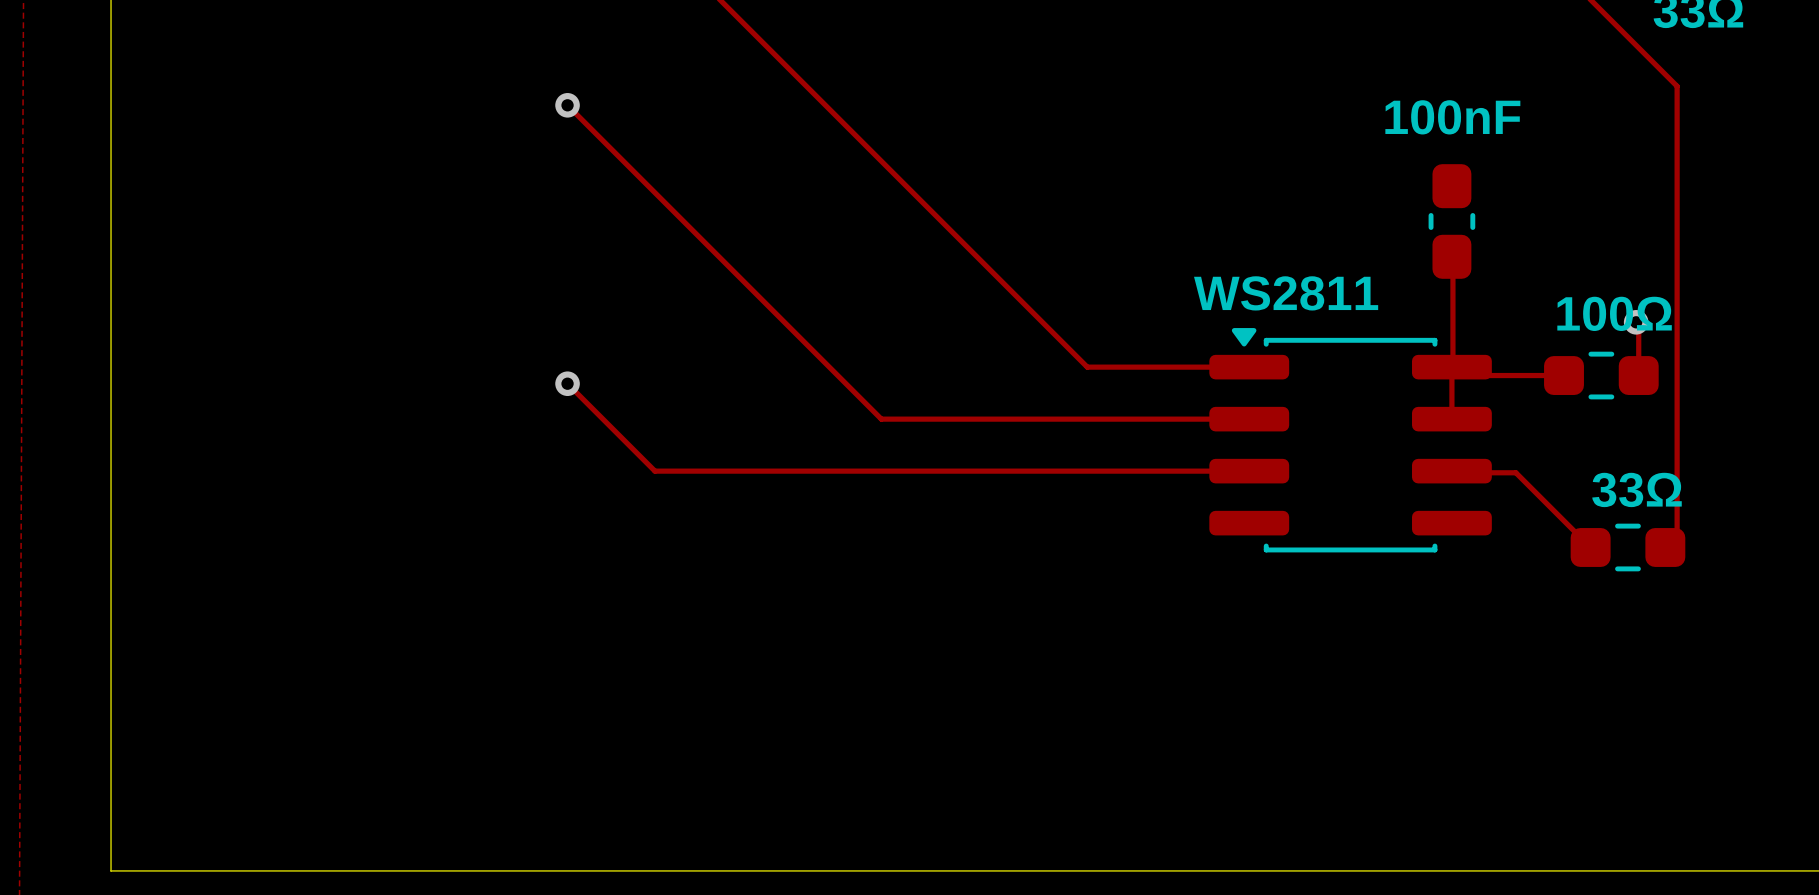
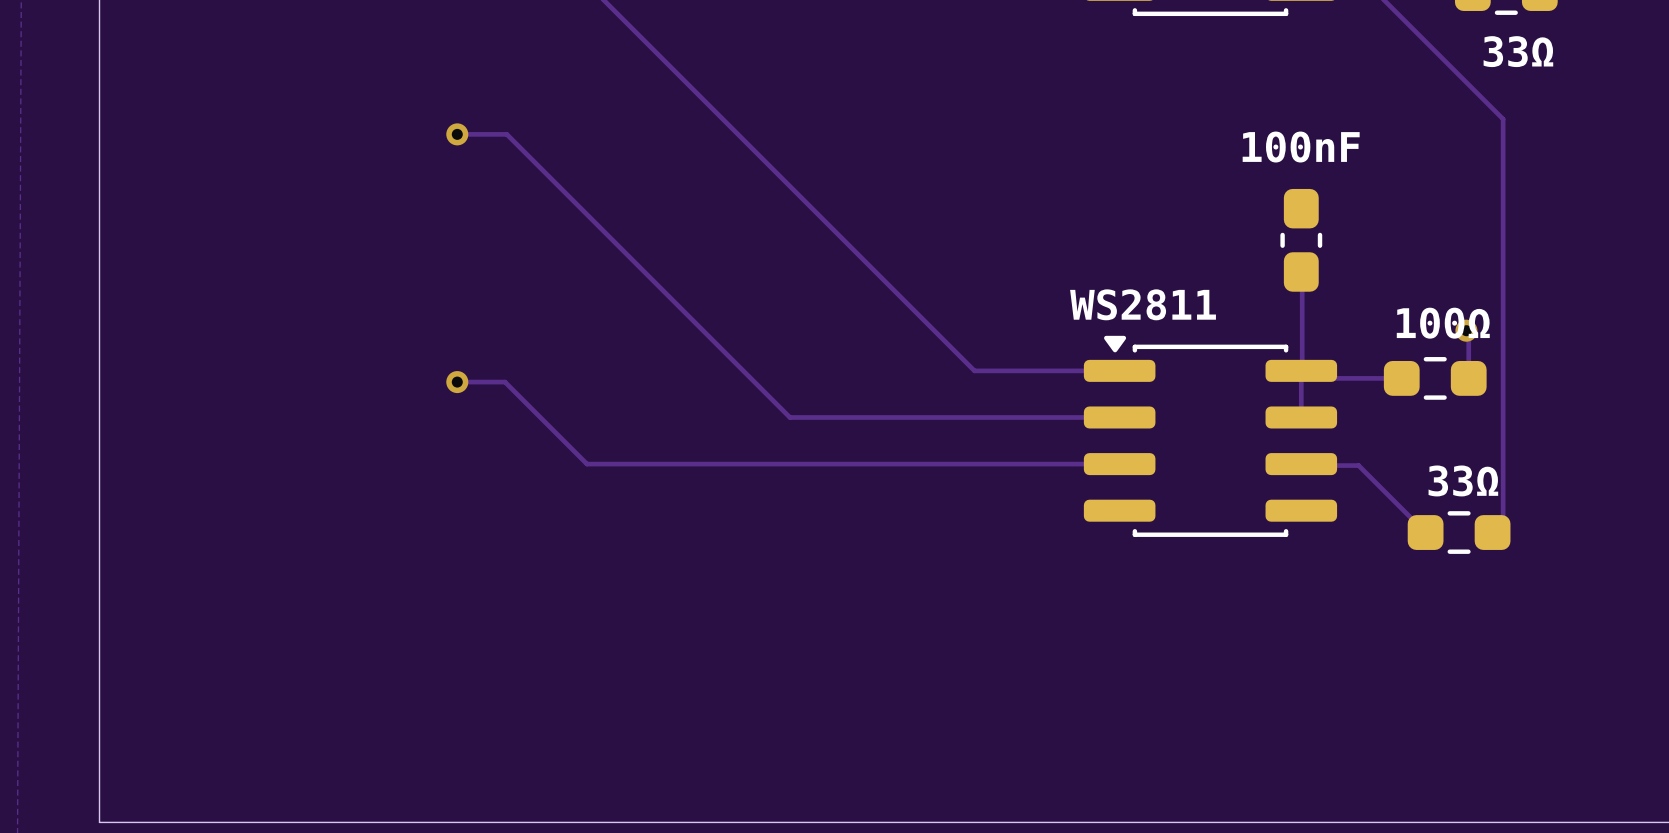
track: none -> (457, 134) (506, 134) (508, 136)
via position: (567, 105) -> (457, 134)
track: none -> (457, 382) (504, 382) (508, 385)
via position: (567, 383) -> (457, 382)

